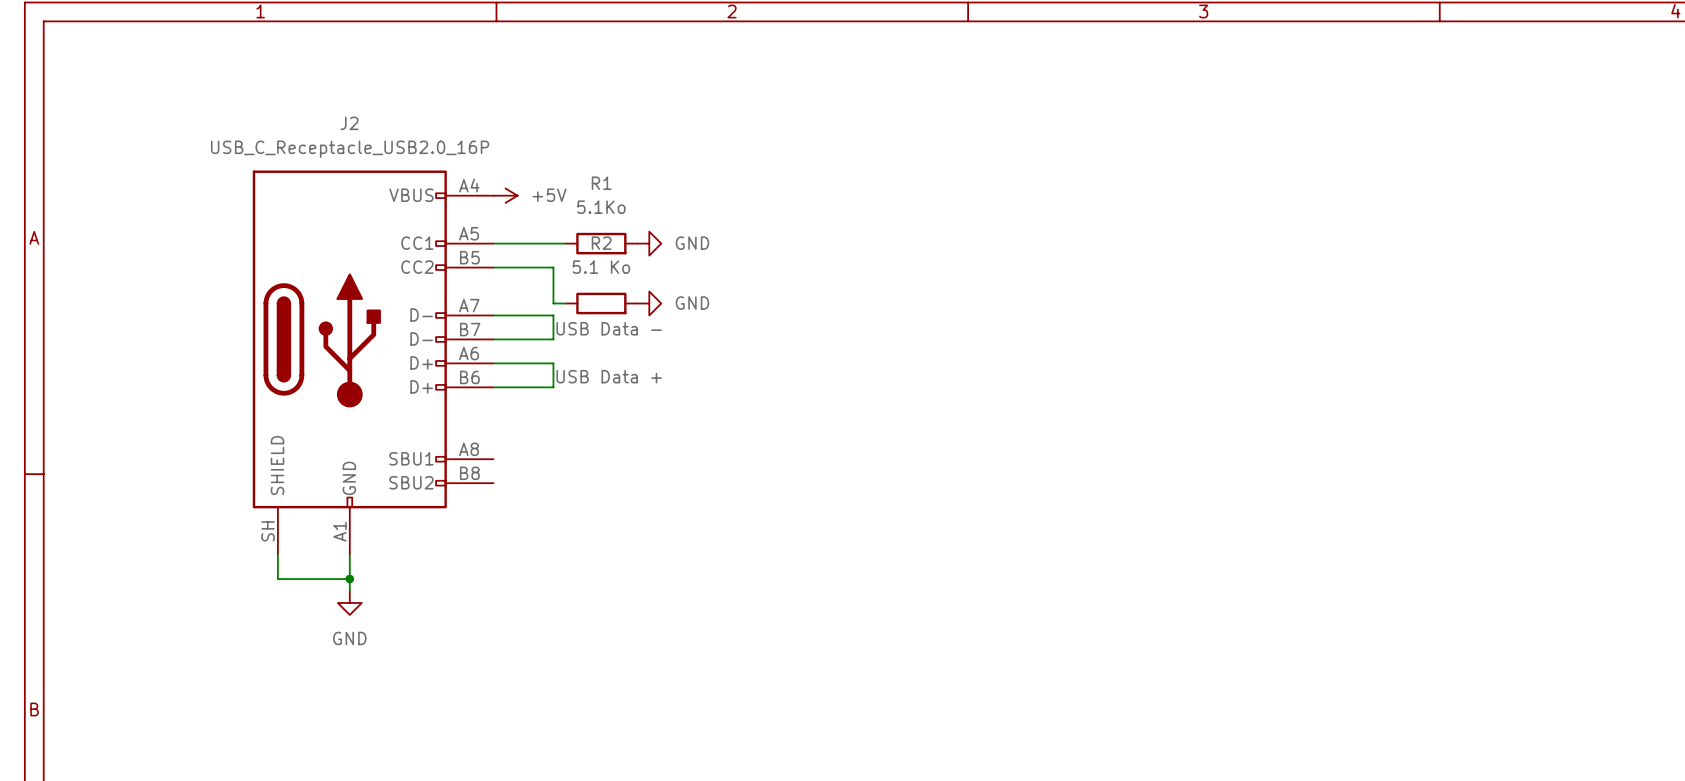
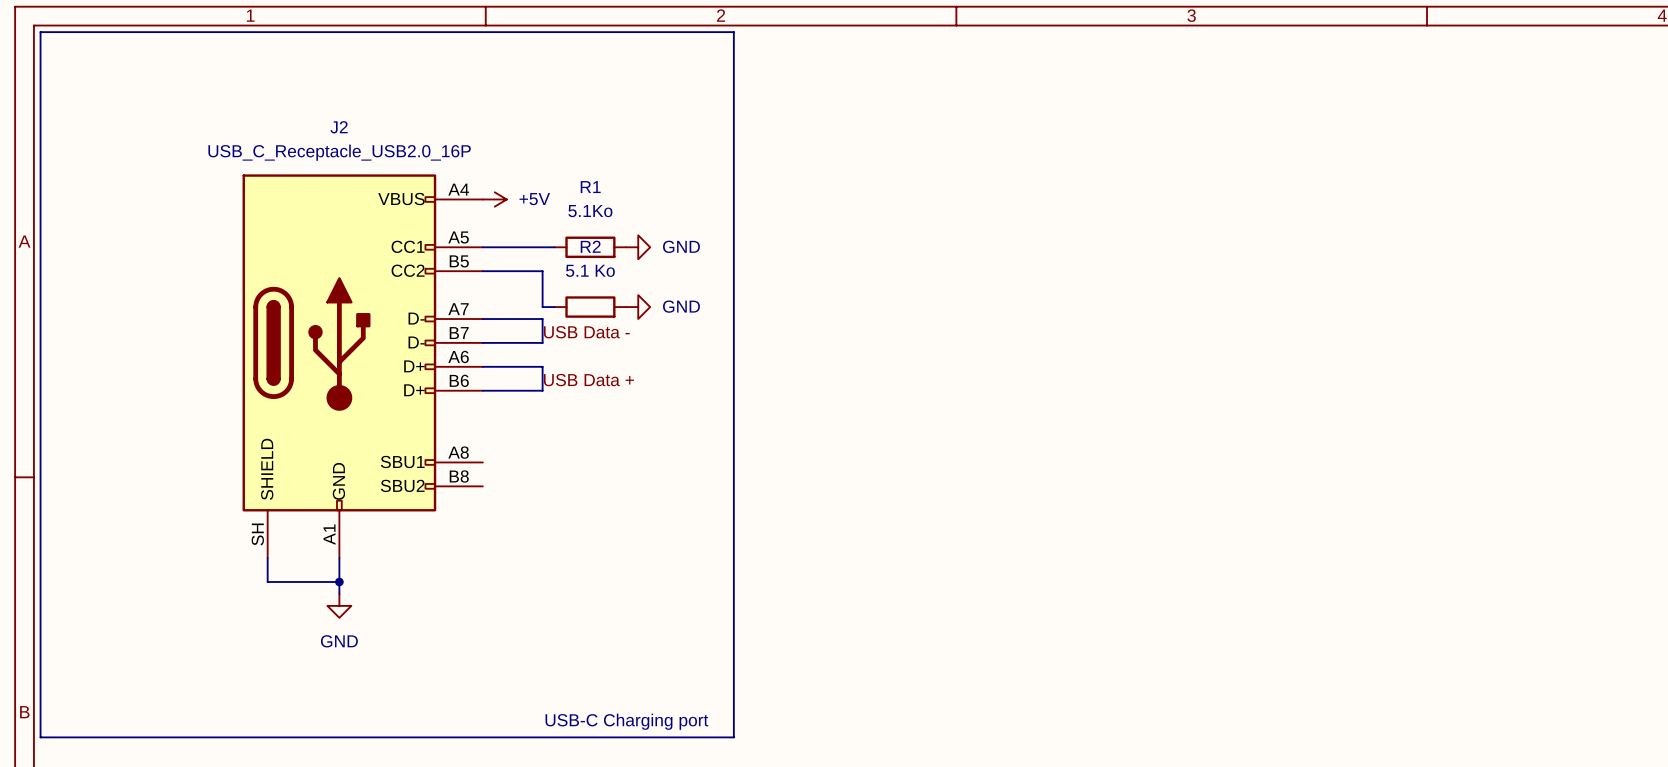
line: none -> (40, 32) (733, 32) (733, 737) (40, 737) (40, 32)
text: none -> USB-C Charging port (626, 721)

